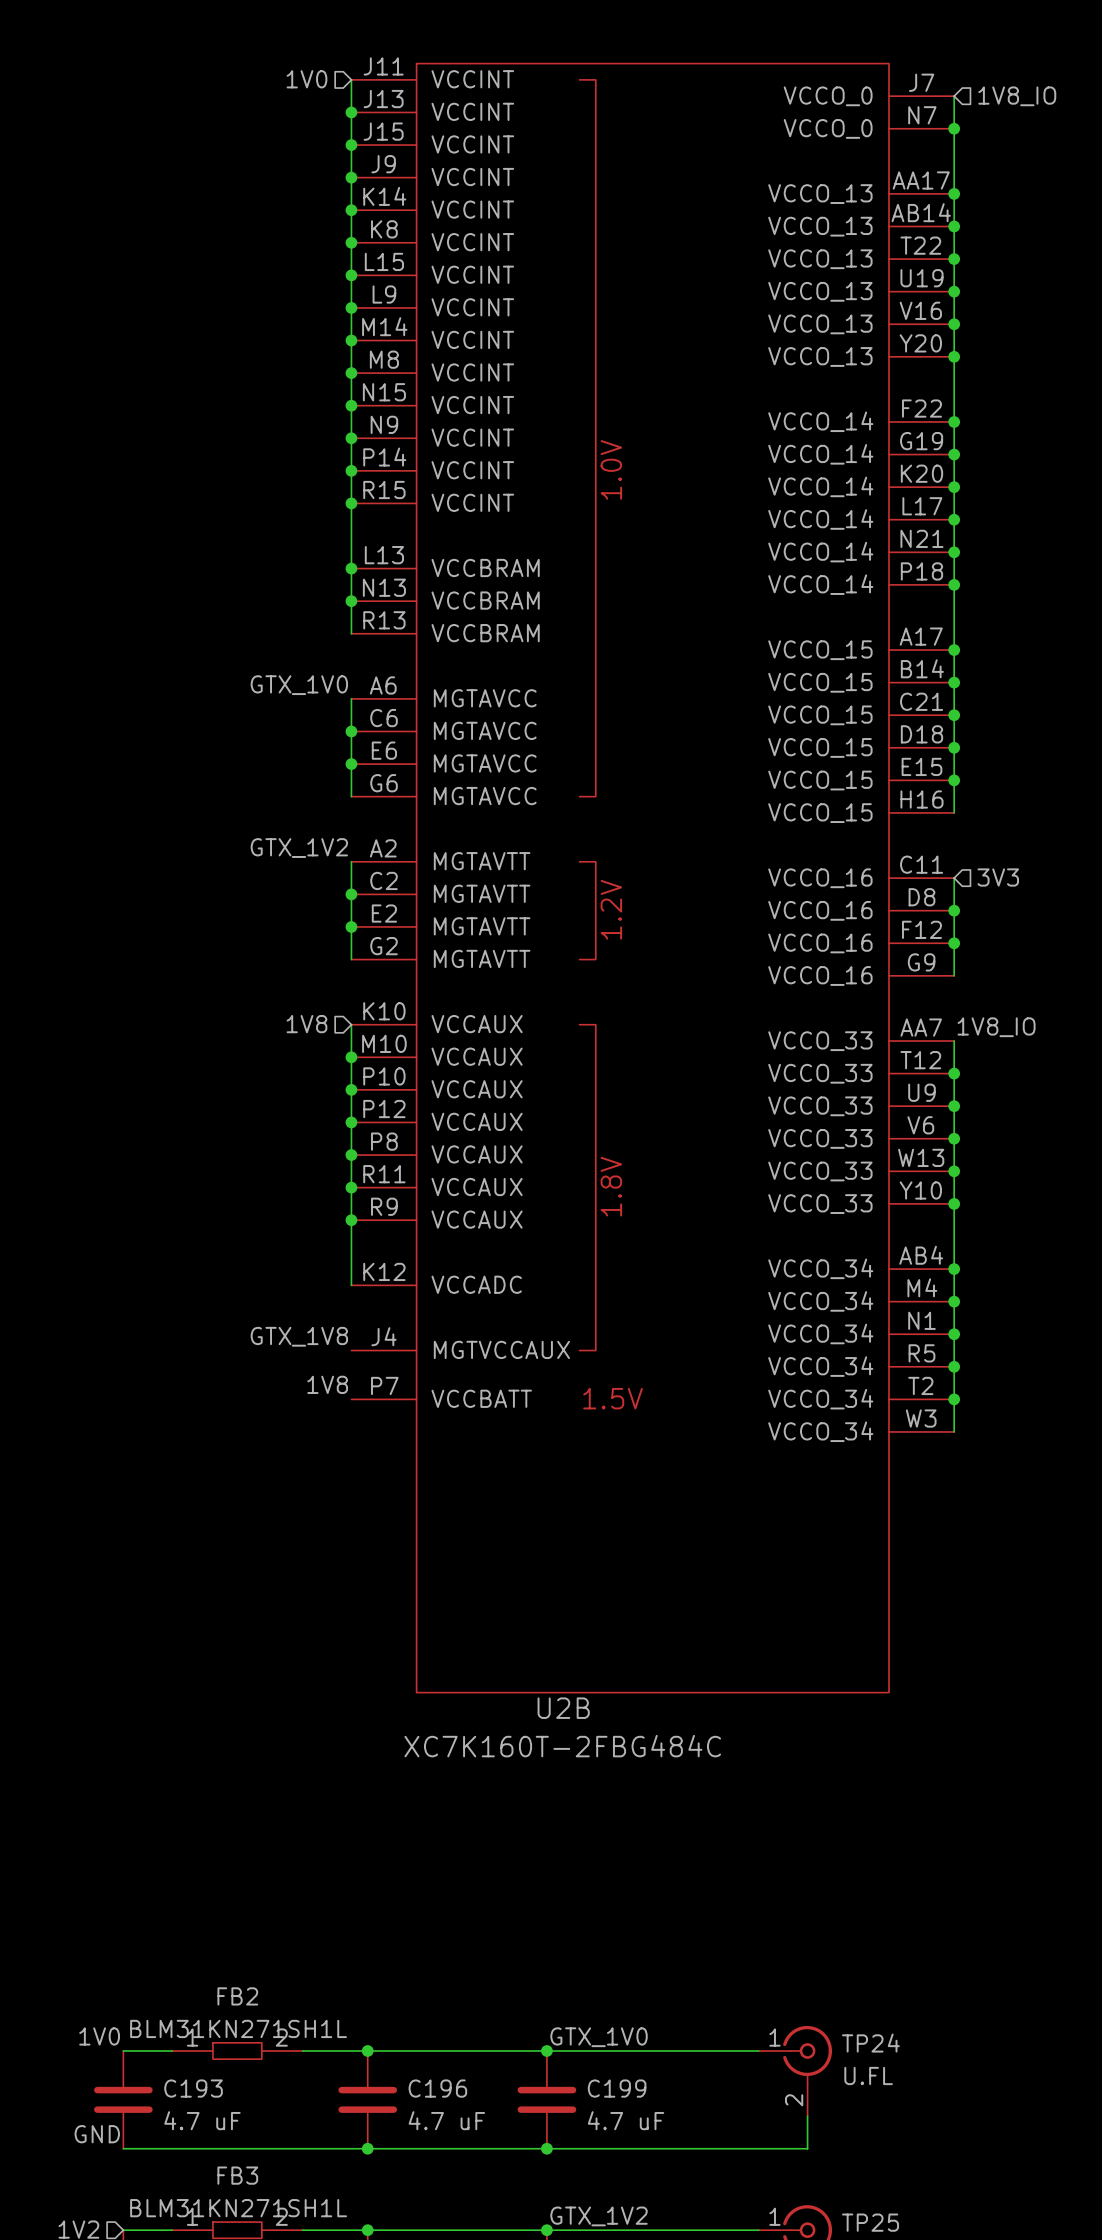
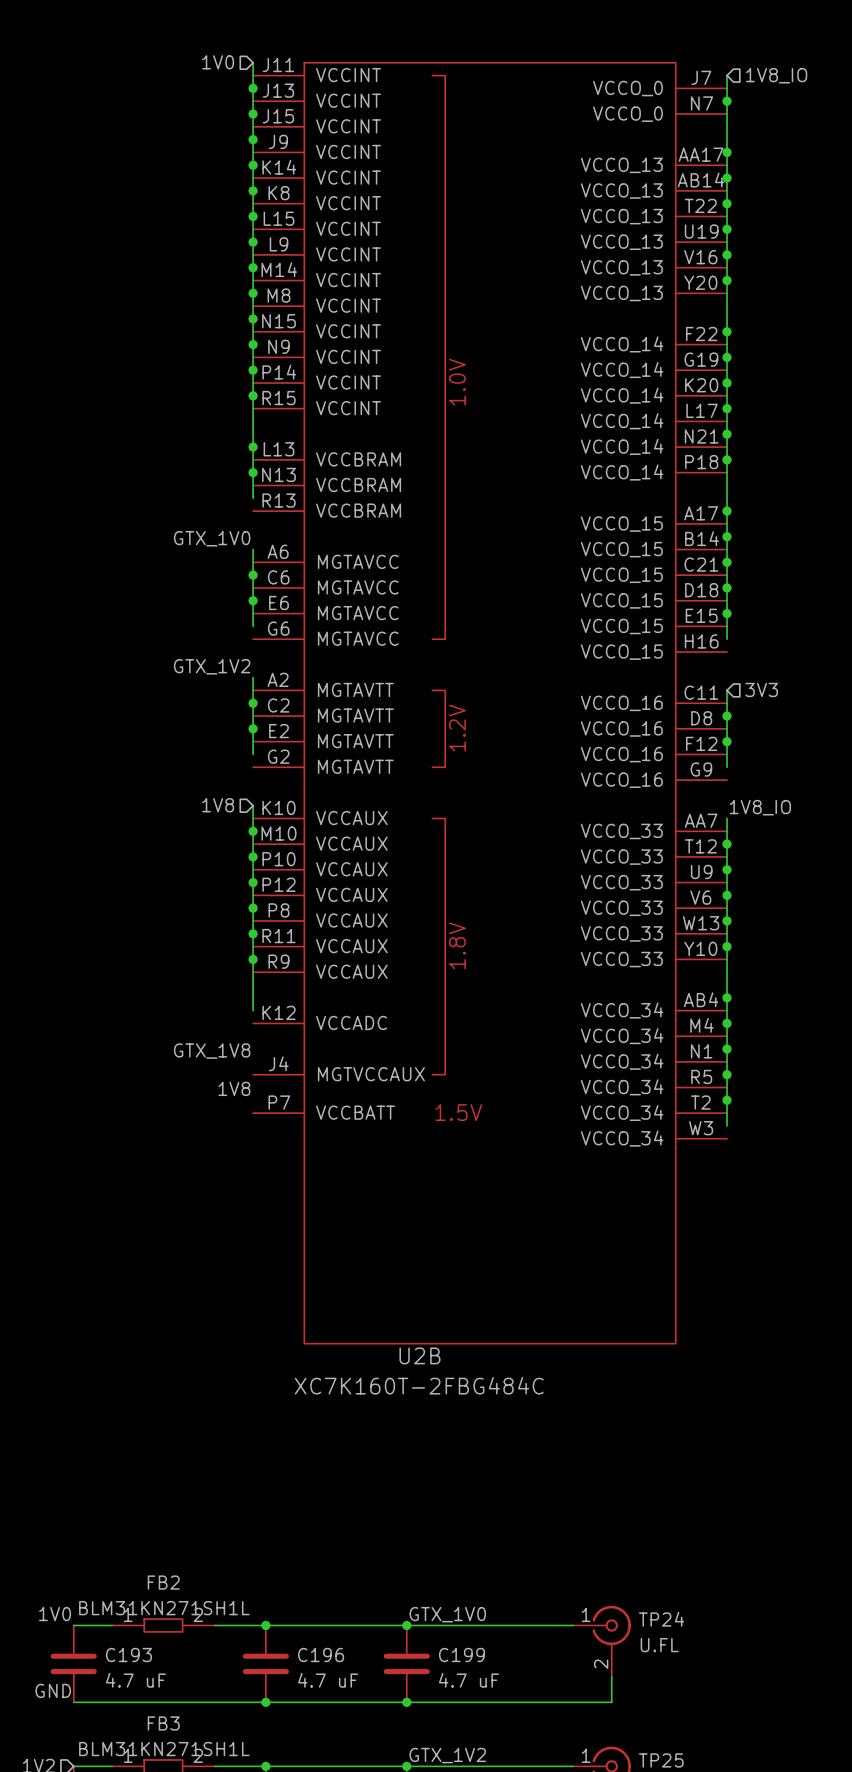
wire: none -> (253, 62) (253, 75)
hierarchical label position: 1V0 (306, 79) -> 1V0 (218, 62)
wire: none -> (727, 75) (727, 88)
junction: none -> (253, 88)
hierarchical label position: 1V8_IO (1017, 96) -> 1V8_IO (776, 75)
junction: (351, 112) -> none
junction: none -> (253, 114)
junction position: (954, 128) -> (727, 101)
junction: (351, 145) -> none
junction: none -> (253, 139)
junction: (351, 177) -> none
junction: none -> (727, 152)
junction: none -> (253, 165)
junction: (954, 193) -> none
junction: (351, 210) -> none
junction: none -> (727, 178)
junction: none -> (253, 190)
junction: (954, 226) -> none
junction: (351, 242) -> none
junction: none -> (727, 203)
junction: none -> (253, 216)
junction: (954, 259) -> none
junction: (351, 275) -> none
junction: none -> (727, 229)
junction: none -> (253, 242)
junction: (954, 291) -> none
junction: (351, 307) -> none
junction: none -> (727, 254)
junction: none -> (253, 267)
junction: (954, 324) -> none
junction: (351, 340) -> none
junction: none -> (727, 280)
junction: none -> (253, 293)
junction: (954, 356) -> none
junction: (351, 373) -> none
junction: none -> (253, 318)
junction: (351, 405) -> none
junction: none -> (727, 331)
junction: none -> (253, 344)
junction: (954, 421) -> none
junction: (351, 438) -> none
junction: none -> (727, 357)
junction: none -> (253, 370)
junction: (954, 454) -> none
junction: (351, 470) -> none
junction: none -> (727, 383)
junction: none -> (253, 395)
junction: (954, 487) -> none
junction: (351, 503) -> none
junction: none -> (727, 408)
junction: (954, 519) -> none
junction: none -> (727, 434)
junction: none -> (253, 447)
junction: (954, 552) -> none
junction: (351, 568) -> none
junction: none -> (727, 459)
junction: none -> (253, 472)
junction: (954, 584) -> none
junction: (351, 601) -> none
wire: (351, 617) (351, 633) -> (253, 549) (253, 562)
junction: none -> (727, 511)
junction: (954, 650) -> none
junction: none -> (727, 536)
junction: (954, 682) -> none
label position: GTX_1V0 (299, 685) -> GTX_1V0 (212, 538)
junction: none -> (727, 562)
junction: none -> (253, 575)
junction: (954, 715) -> none
junction: (351, 731) -> none
junction: none -> (727, 587)
junction: none -> (253, 600)
junction: (954, 747) -> none
junction: (351, 764) -> none
junction: none -> (727, 613)
wire: (351, 780) (351, 796) -> (253, 677) (253, 690)
junction: (954, 780) -> none
wire: (954, 796) (954, 812) -> (727, 690) (727, 703)
label position: GTX_1V2 (299, 848) -> GTX_1V2 (212, 666)
hierarchical label position: 3V3 (998, 877) -> 3V3 (761, 689)
junction: none -> (253, 703)
junction: (351, 894) -> none
junction: none -> (727, 716)
junction: none -> (253, 728)
junction: (954, 910) -> none
junction: (351, 926) -> none
junction: none -> (727, 741)
wire: (351, 943) (351, 959) -> (253, 805) (253, 818)
junction: (954, 943) -> none
wire: (954, 959) (954, 975) -> (727, 818) (727, 831)
hierarchical label position: 1V8 (306, 1024) -> 1V8 (218, 805)
label position: 1V8_IO (996, 1027) -> 1V8_IO (760, 807)
junction: none -> (253, 831)
junction: (351, 1057) -> none
junction: none -> (727, 844)
junction: none -> (253, 856)
junction: (954, 1073) -> none
junction: (351, 1089) -> none
junction: none -> (727, 869)
junction: none -> (253, 882)
junction: (954, 1106) -> none
junction: (351, 1122) -> none
junction: none -> (727, 895)
junction: none -> (253, 908)
junction: (954, 1138) -> none
junction: (351, 1155) -> none
junction: none -> (727, 920)
junction: none -> (253, 933)
junction: (954, 1171) -> none
junction: (351, 1187) -> none
junction: none -> (727, 946)
junction: none -> (253, 959)
junction: (954, 1203) -> none
junction: (351, 1220) -> none
junction: none -> (727, 997)
wire: (351, 1269) (351, 1285) -> none
junction: (954, 1269) -> none
junction: none -> (727, 1023)
junction: (954, 1301) -> none
junction: none -> (727, 1049)
junction: (954, 1334) -> none
label position: GTX_1V8 (299, 1336) -> GTX_1V8 (212, 1051)
junction: none -> (727, 1074)
junction: (954, 1366) -> none
junction: none -> (727, 1100)
label position: 1V8 (327, 1384) -> 1V8 (234, 1088)
junction: (954, 1399) -> none
wire: (954, 1415) (954, 1431) -> none

